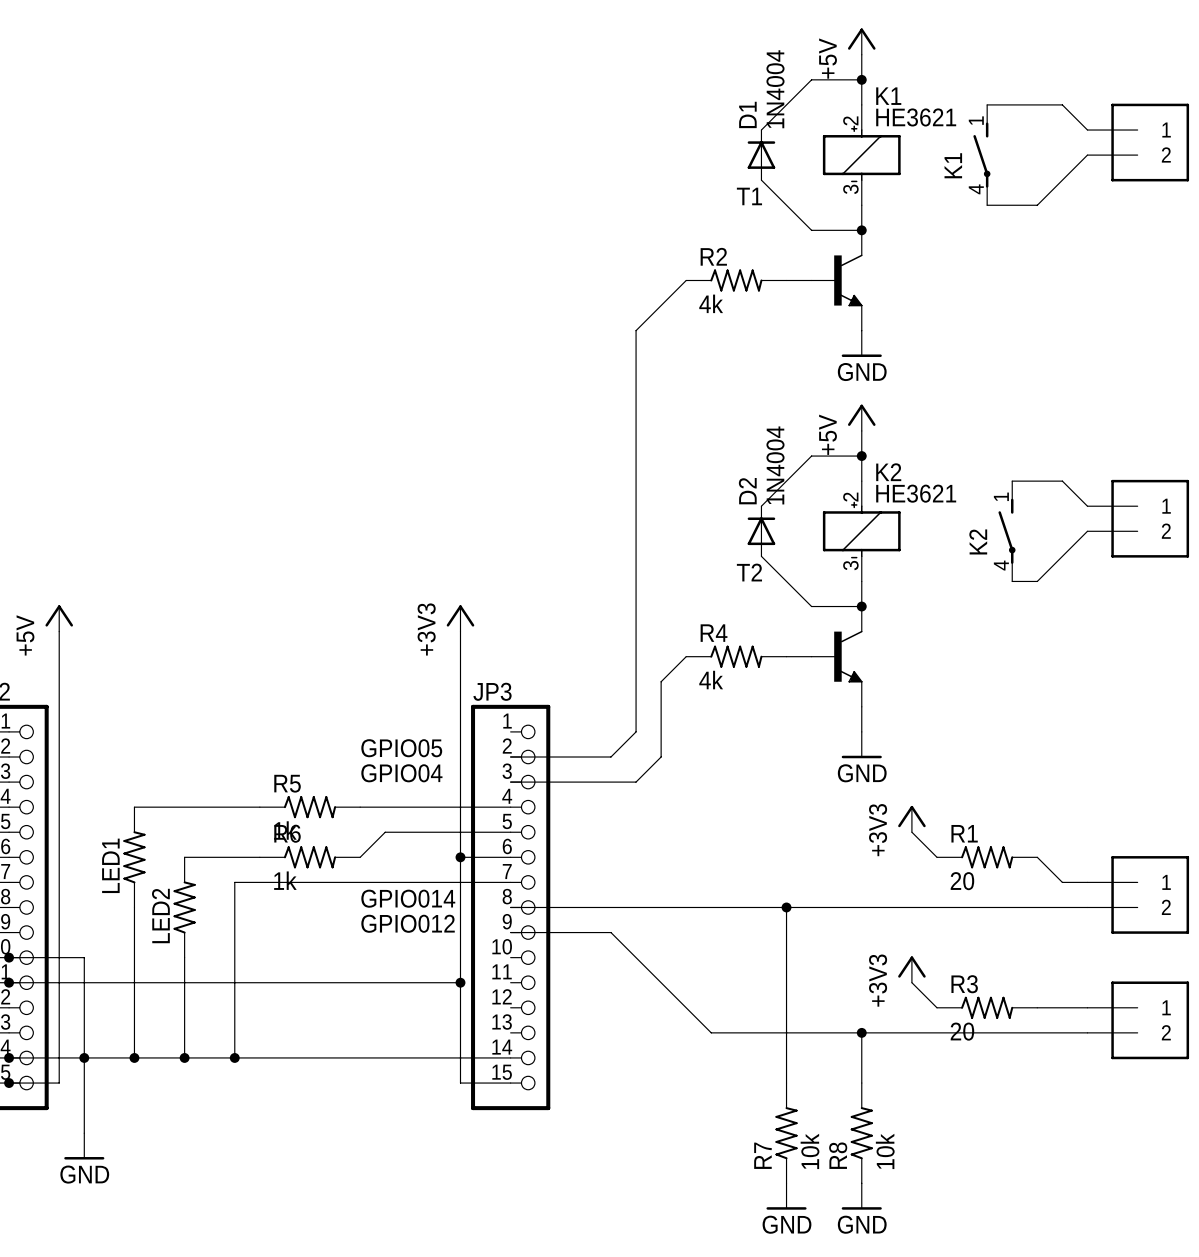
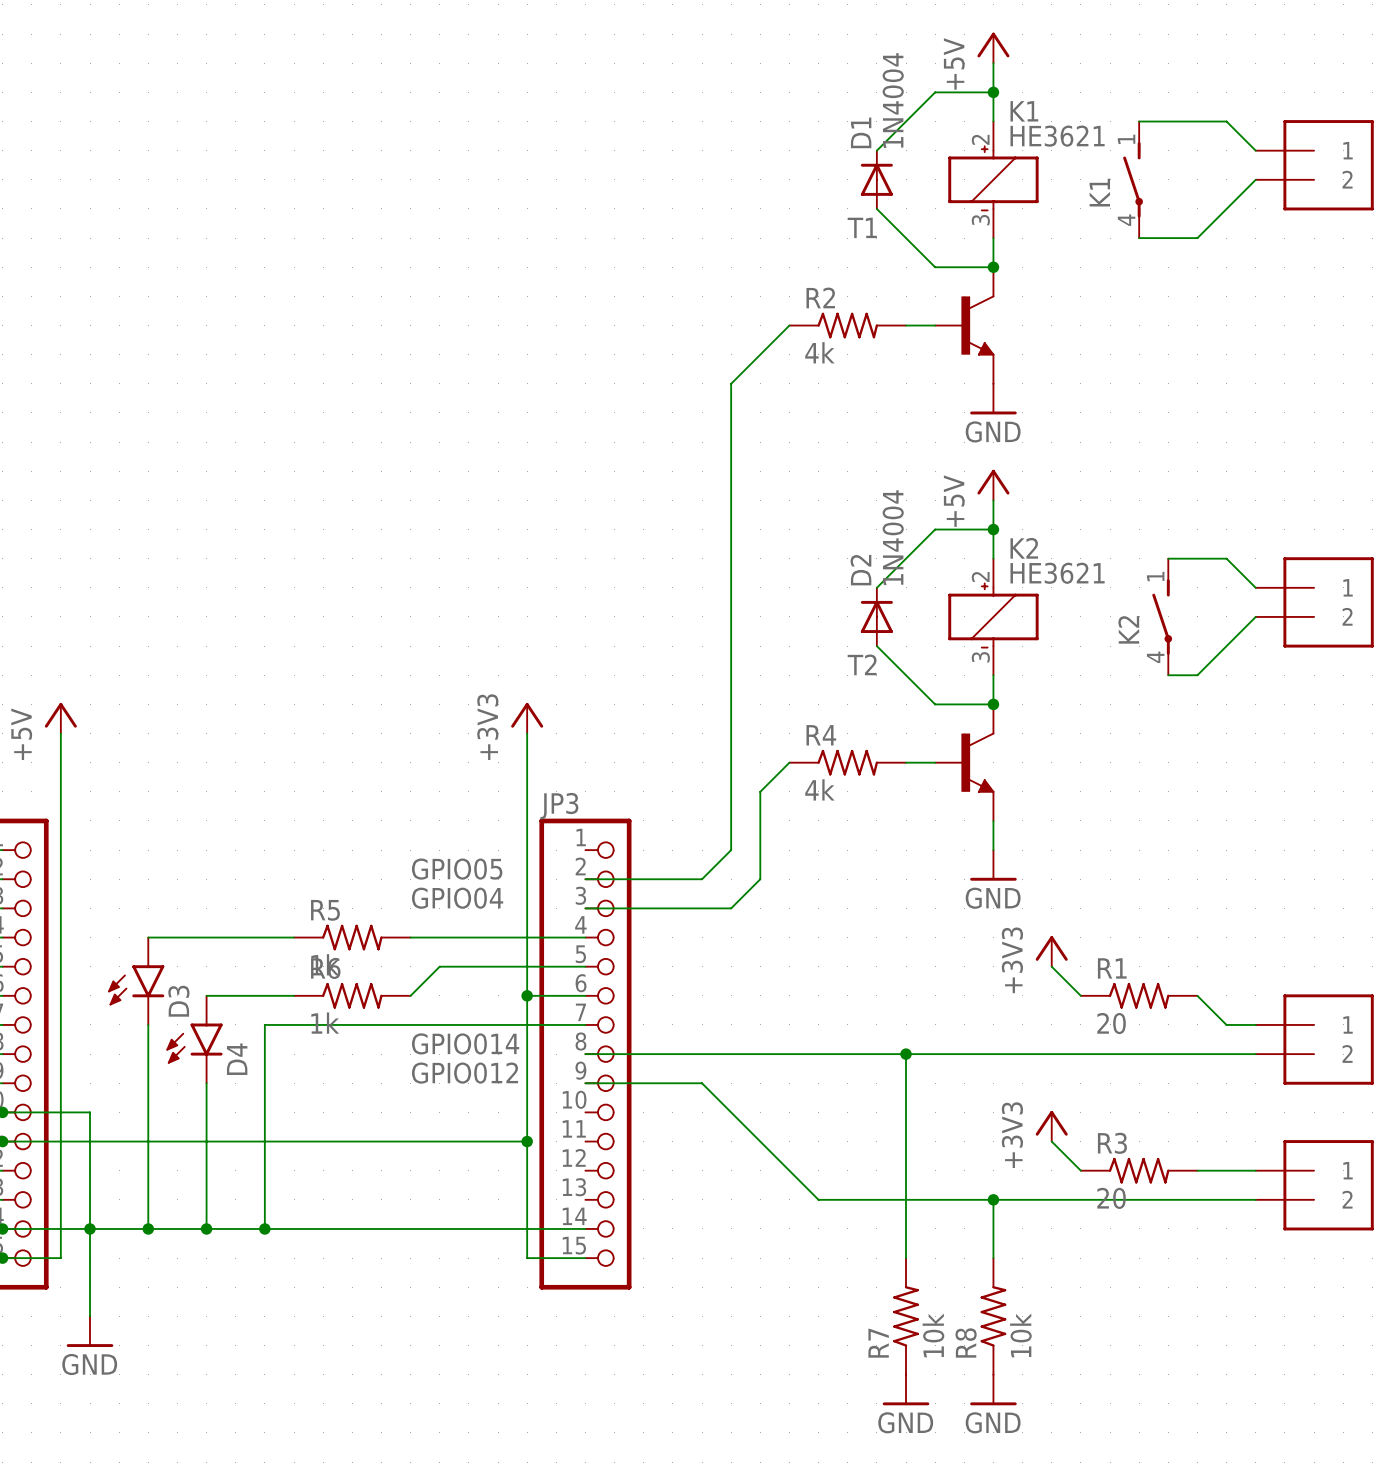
D3: none -> (136, 981)
LED1: (134, 857) -> none
D4: none -> (194, 1039)
LED2: (184, 907) -> none

